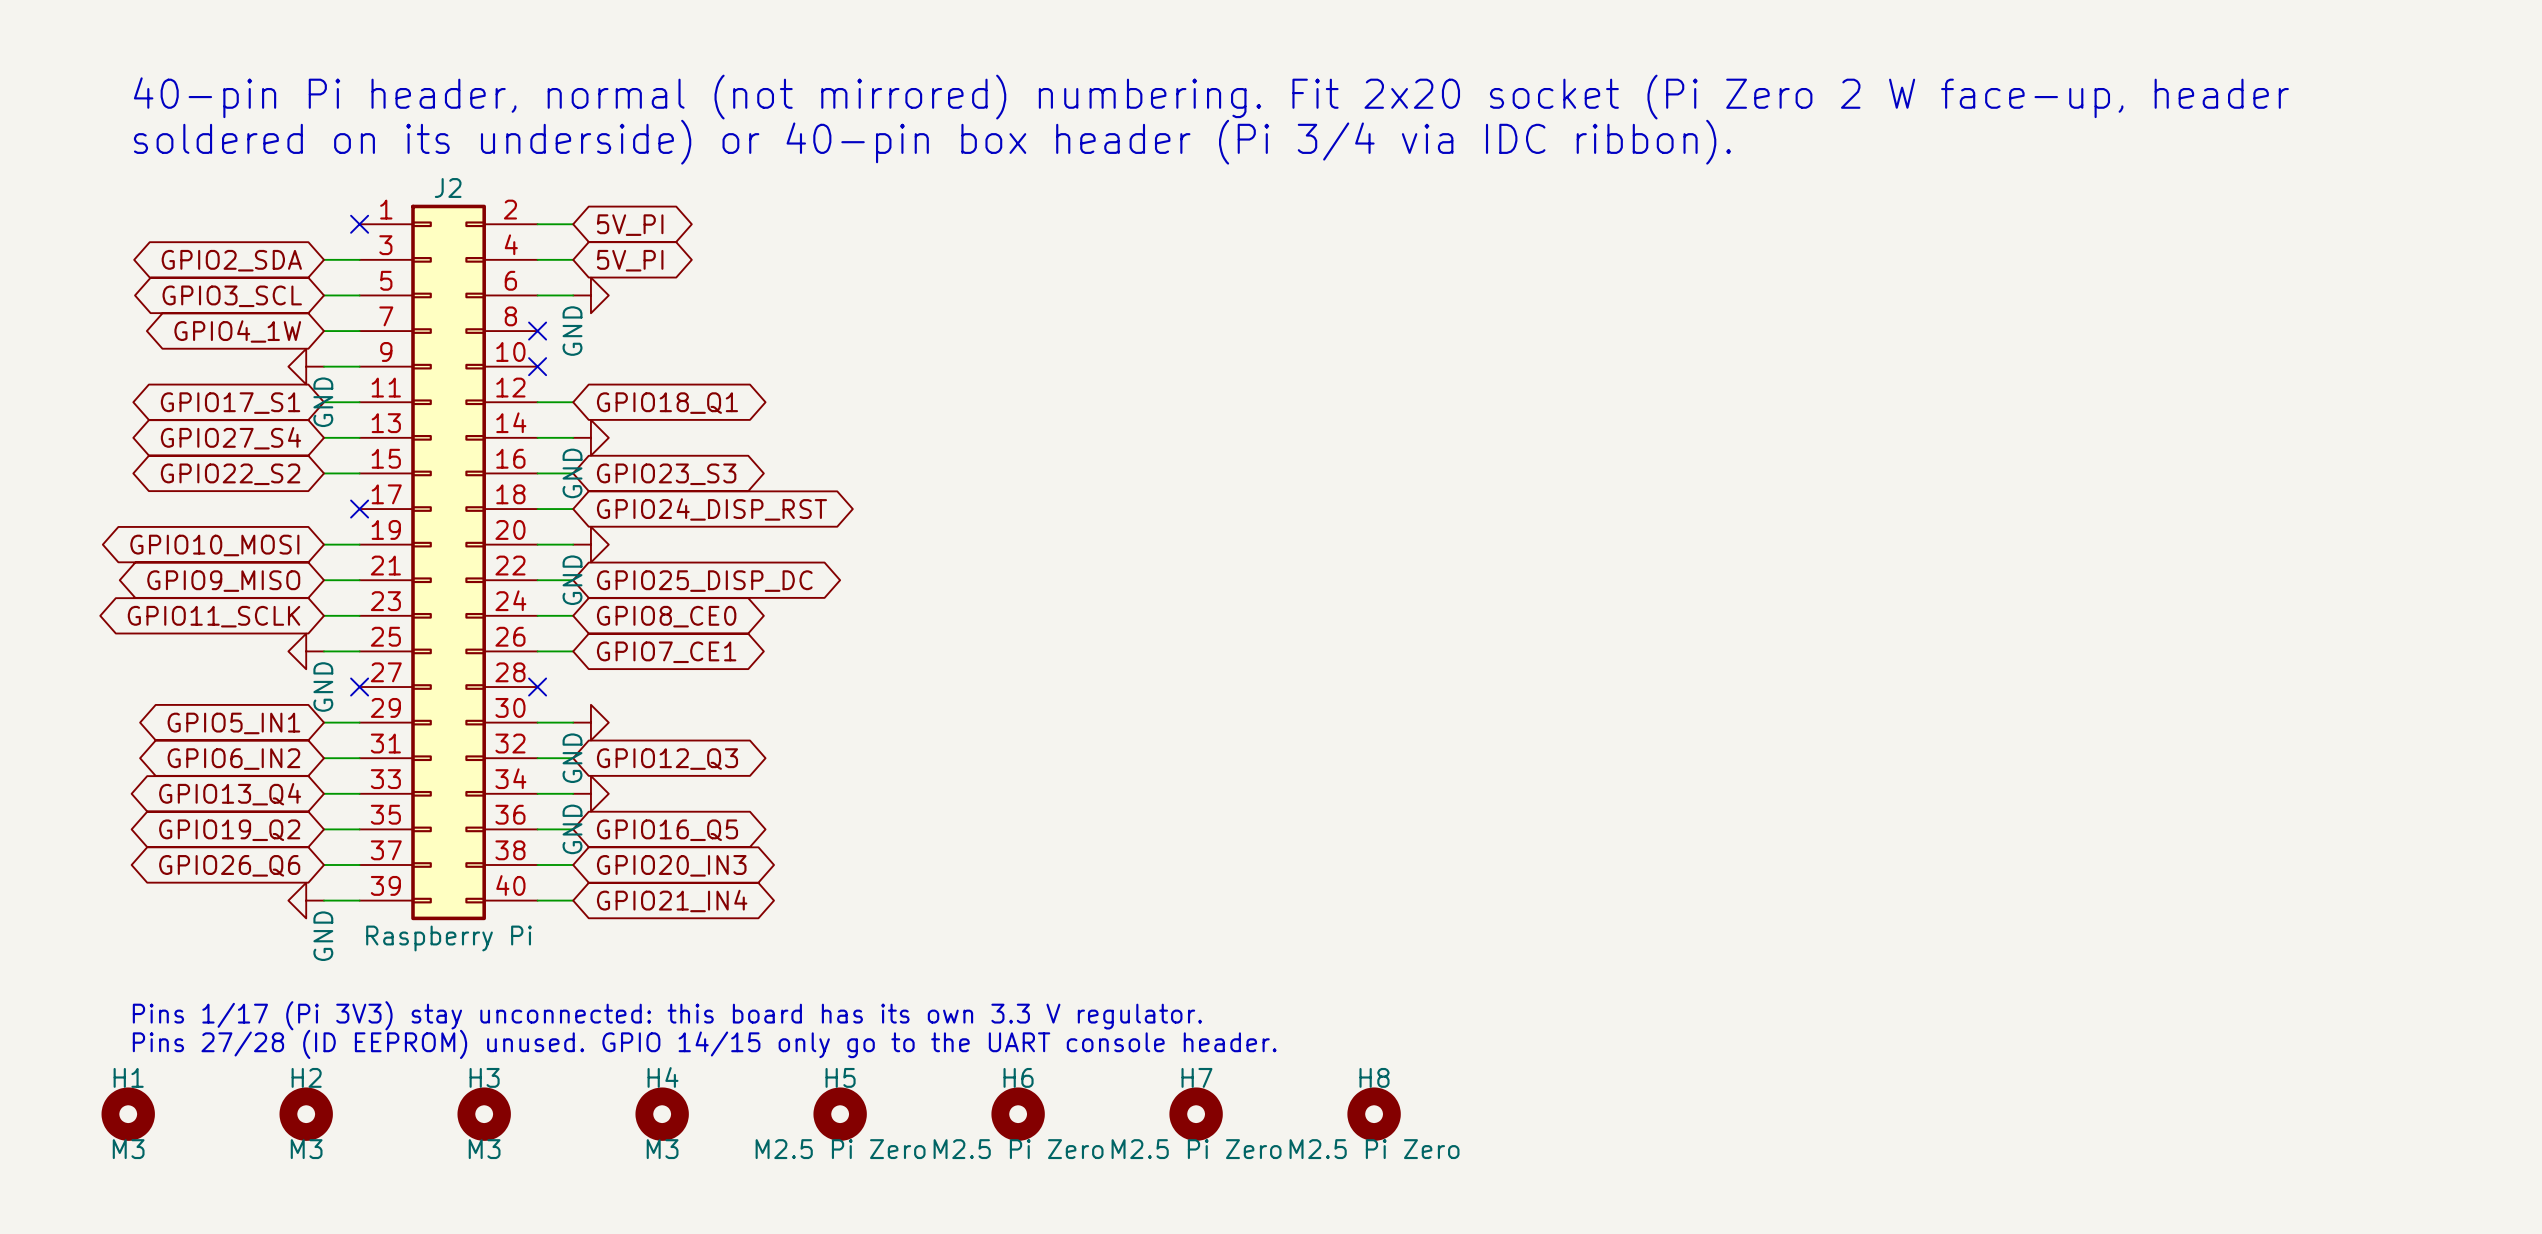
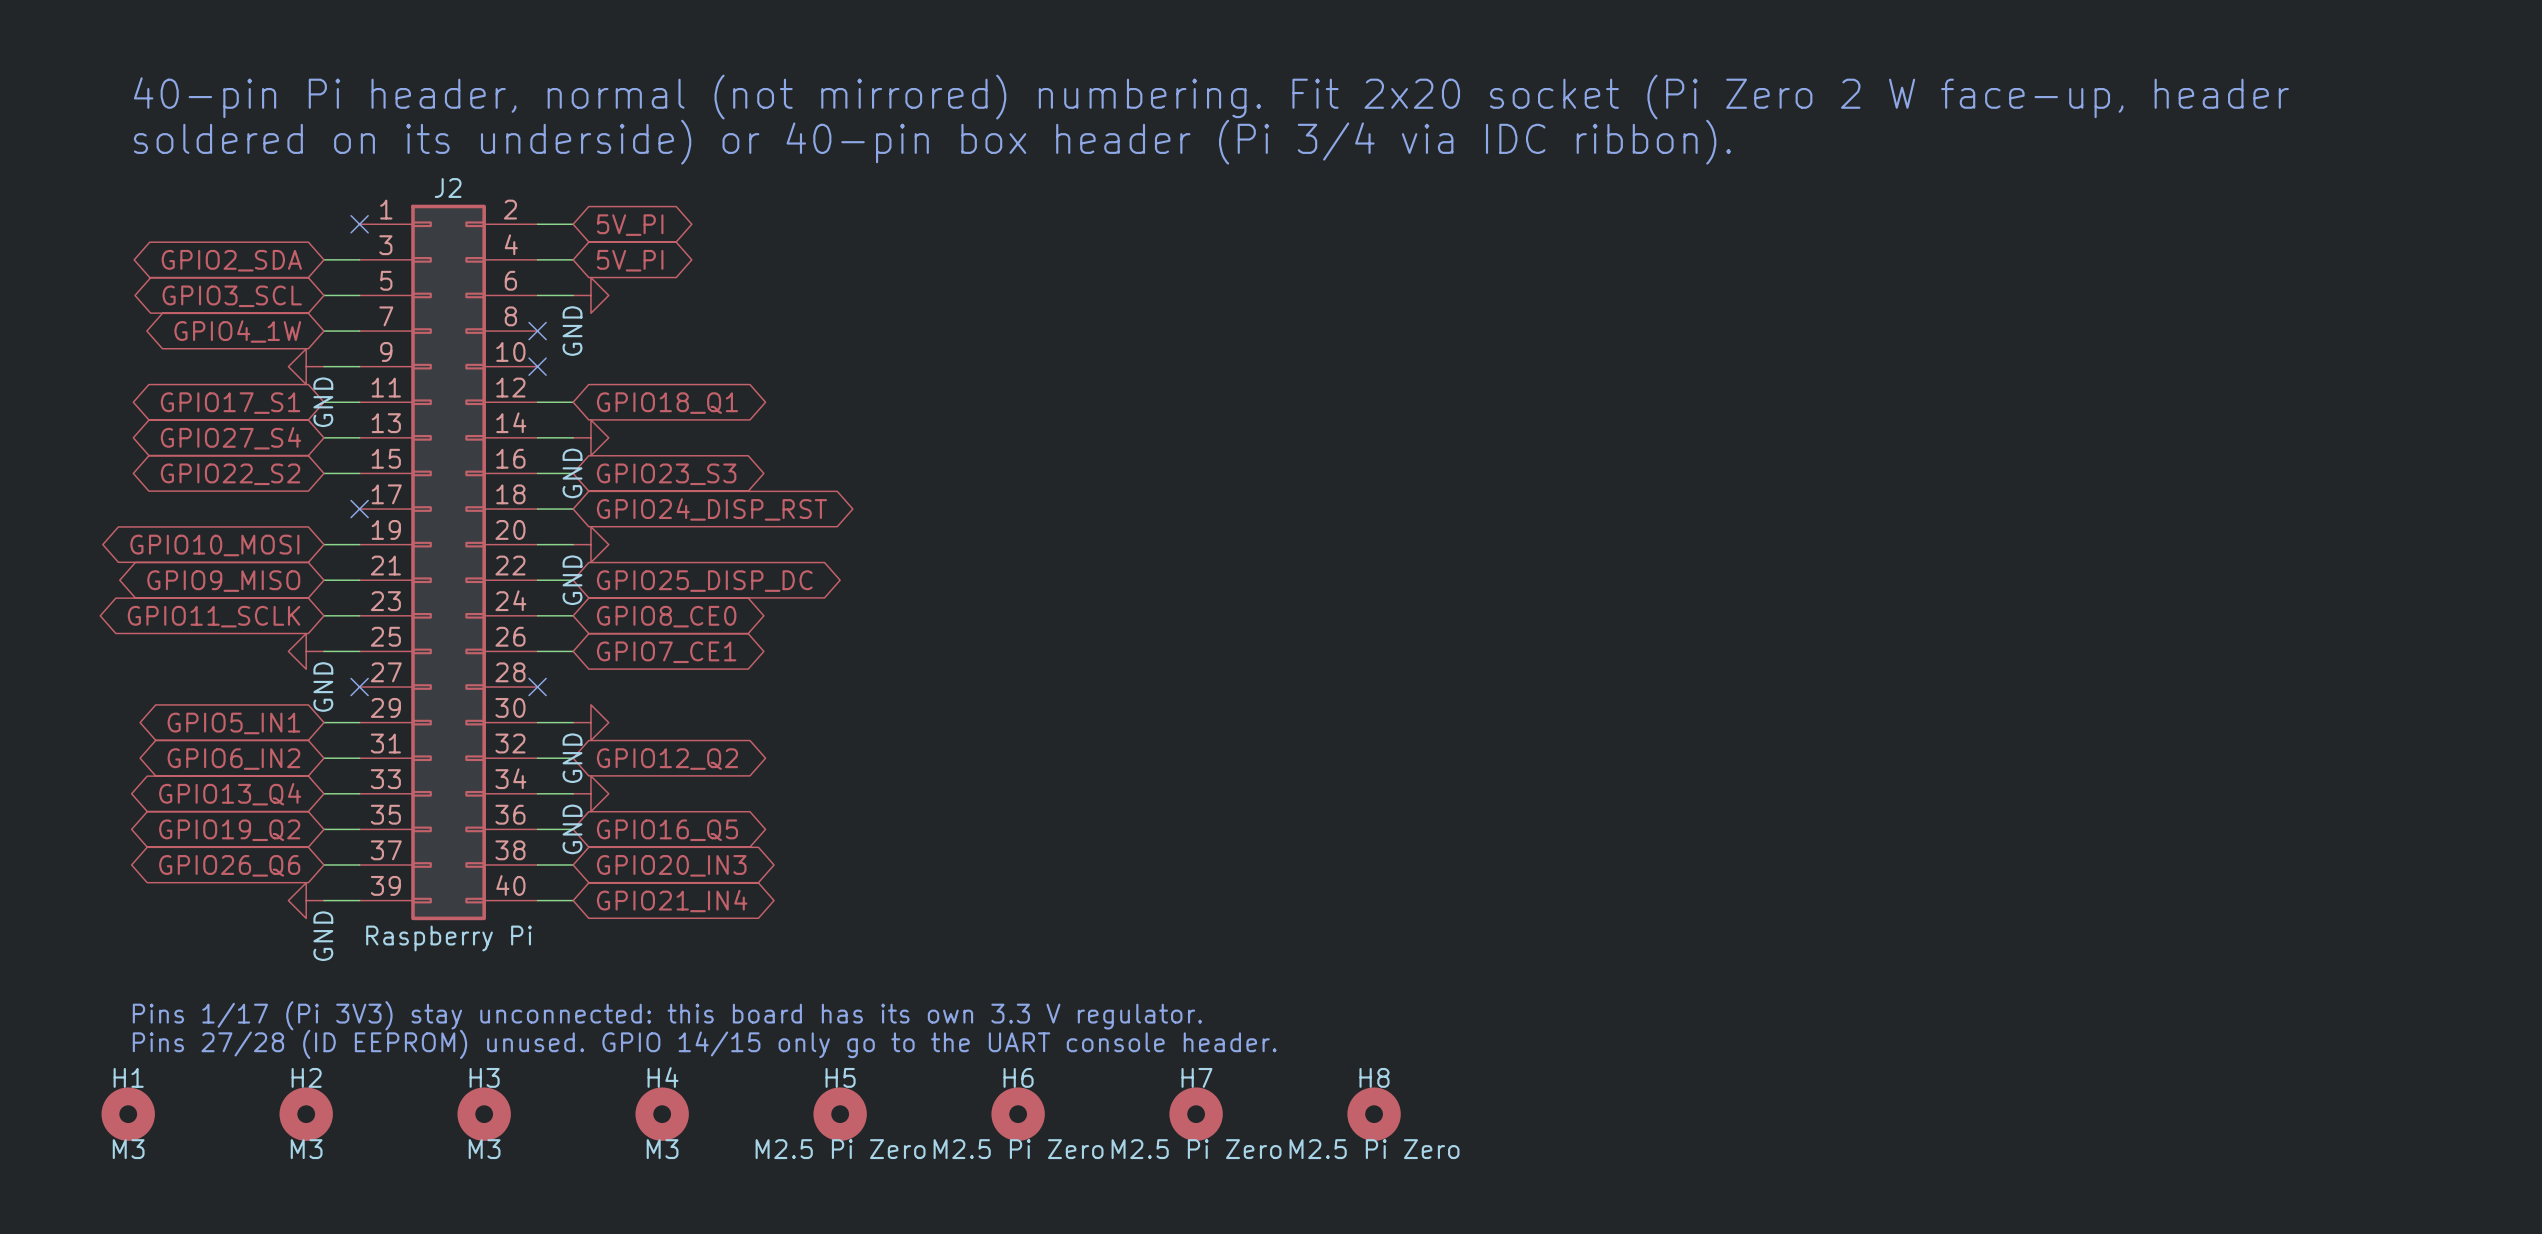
global label: GPIO12_Q3 (667, 759) -> GPIO12_Q2 (667, 759)

